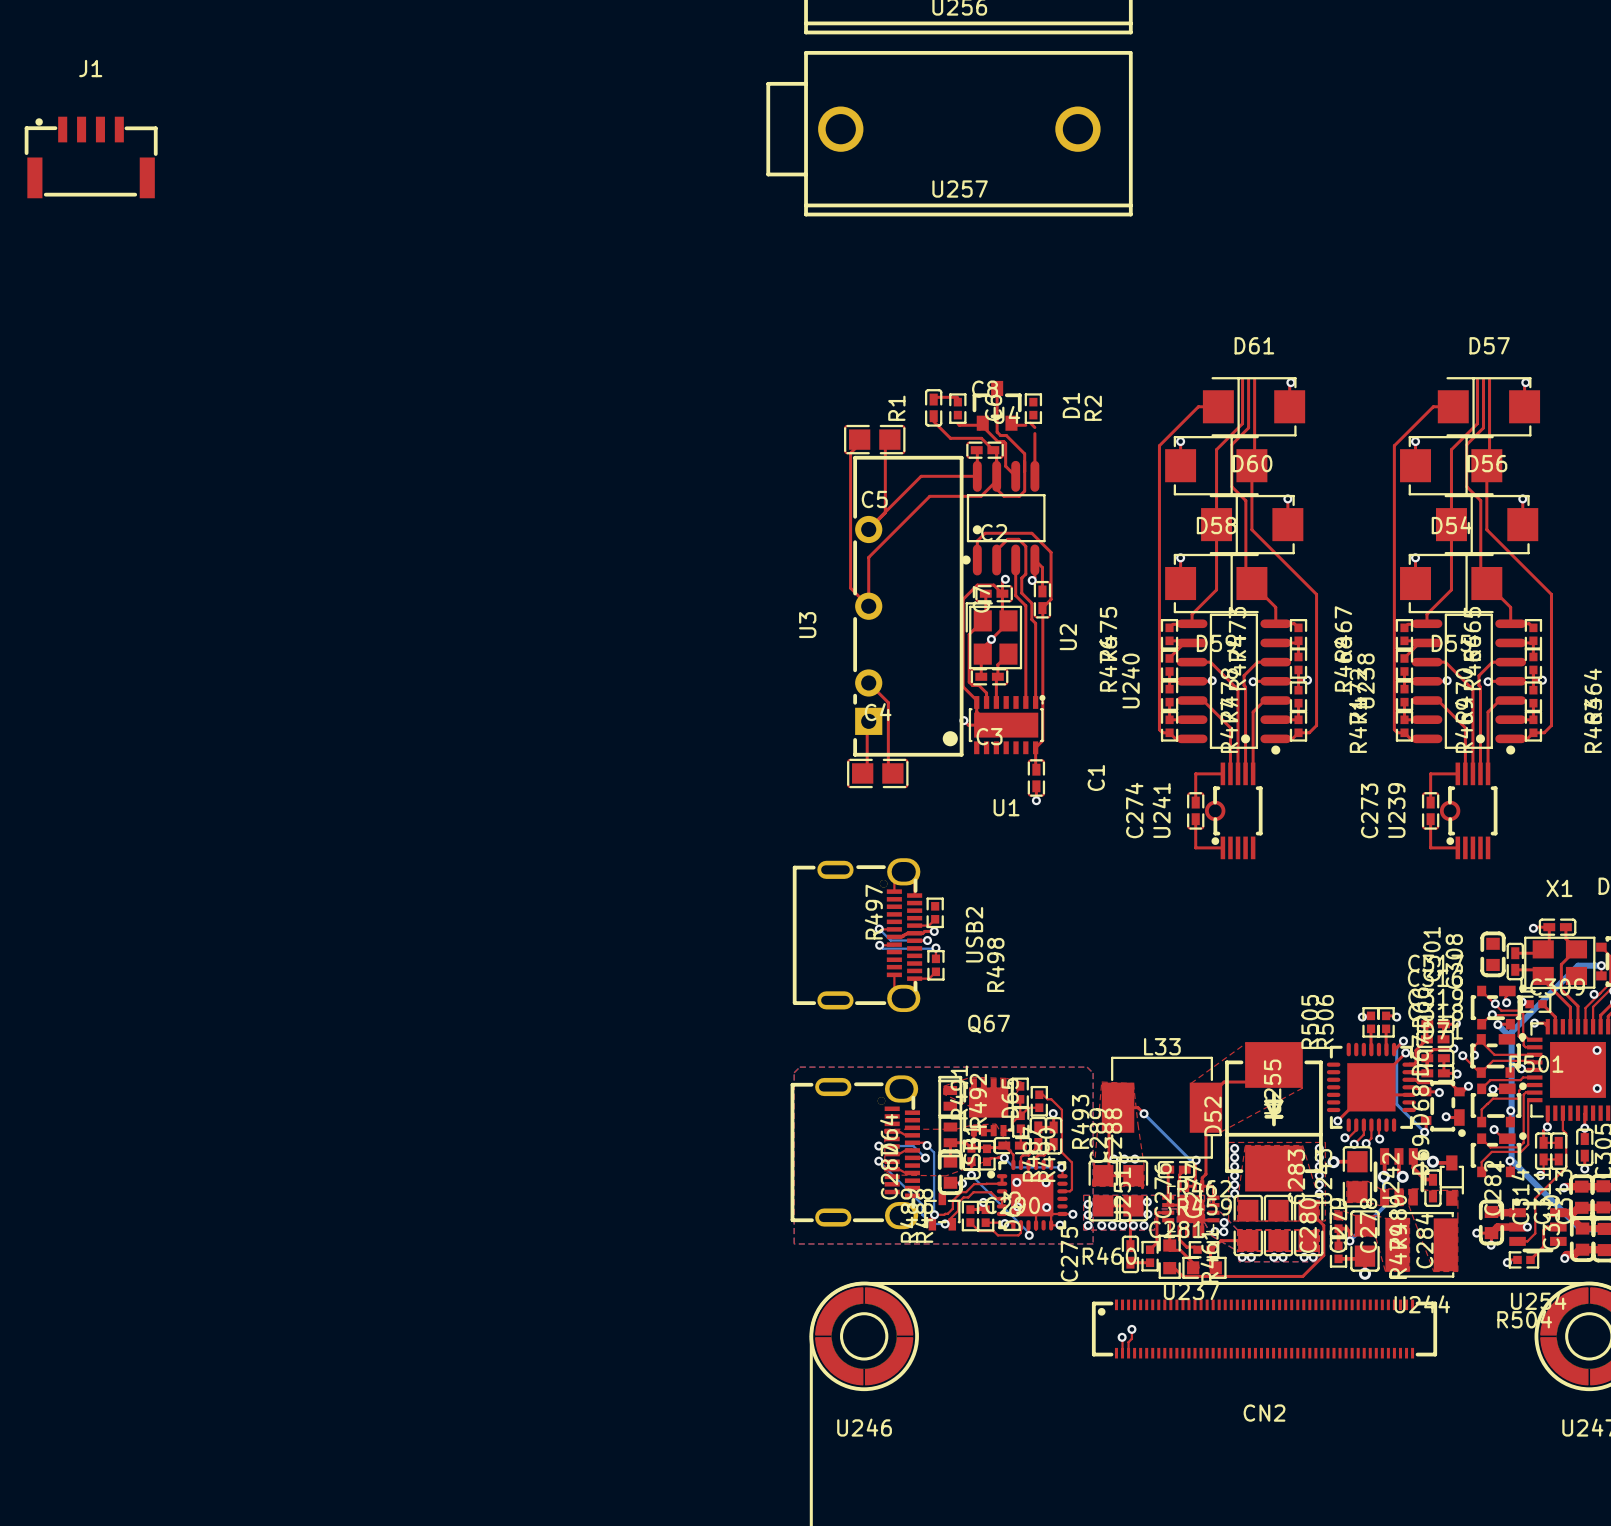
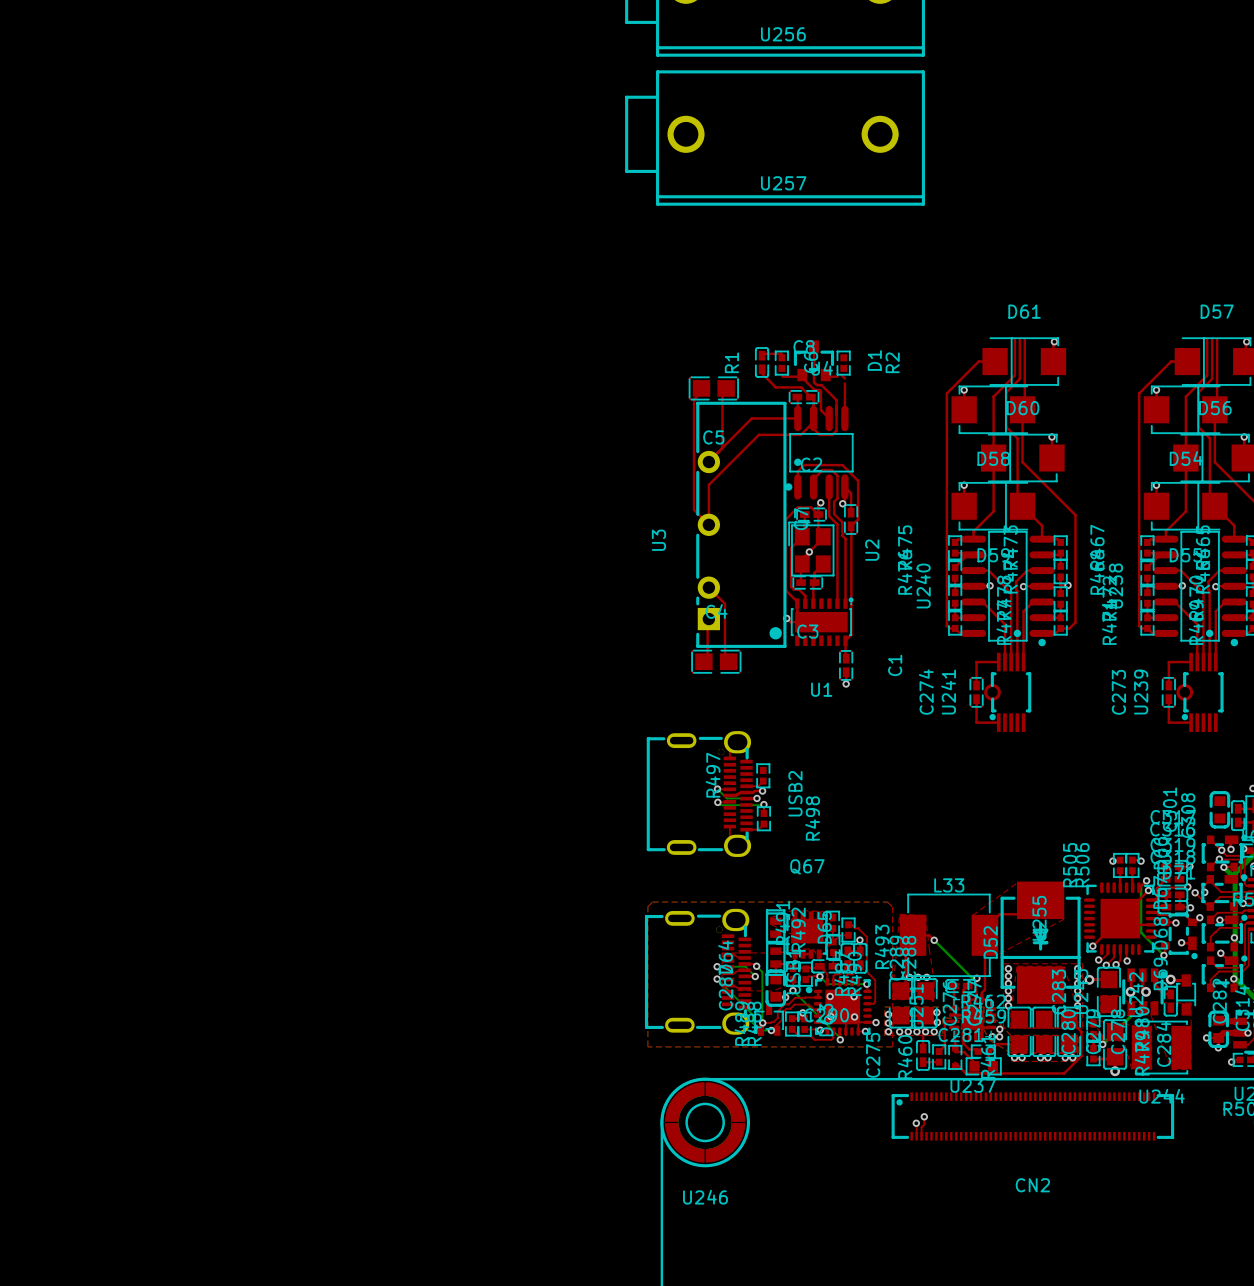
J1: (91, 157) -> none
R460 footprint: [1158, 1234, 1181, 1279] -> [948, 1044, 963, 1071]
R460 name rotation: 0° (1109, 1255) -> 90° counterclockwise (905, 1057)

